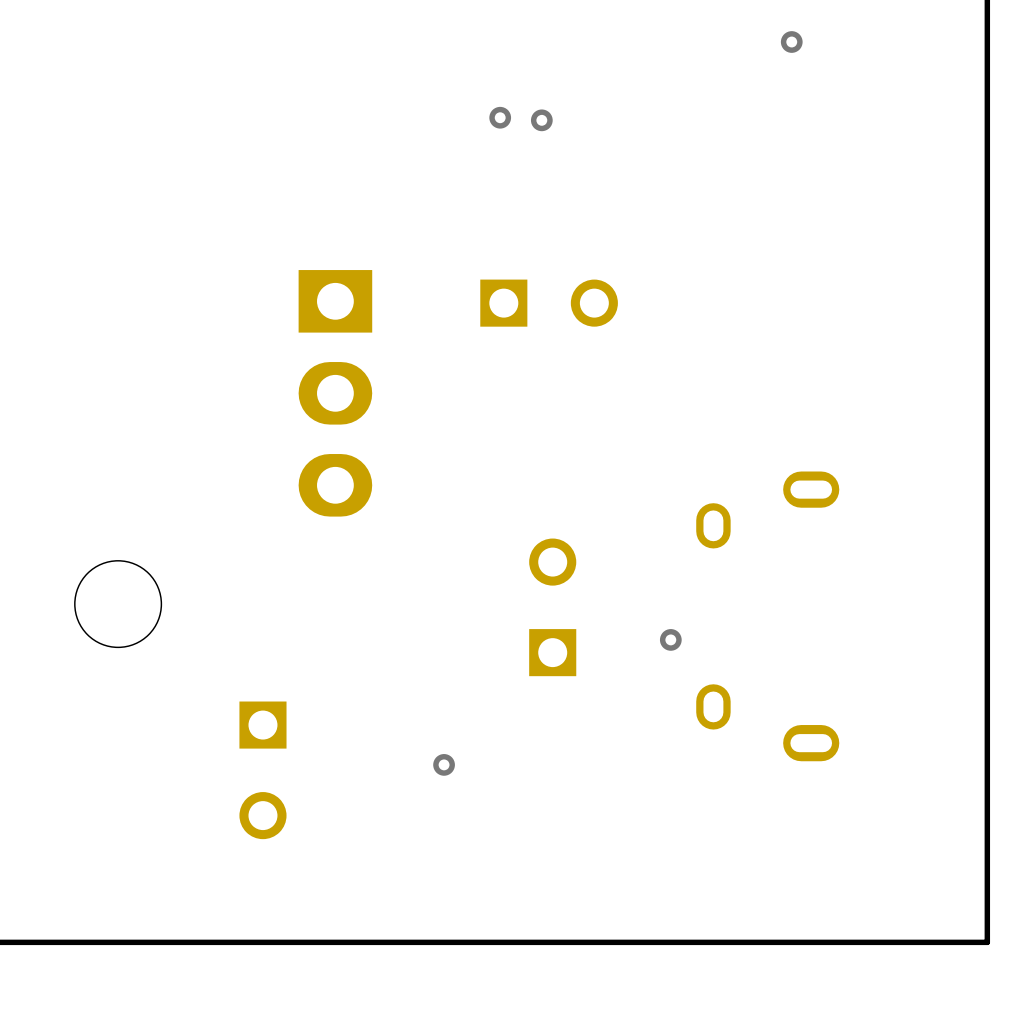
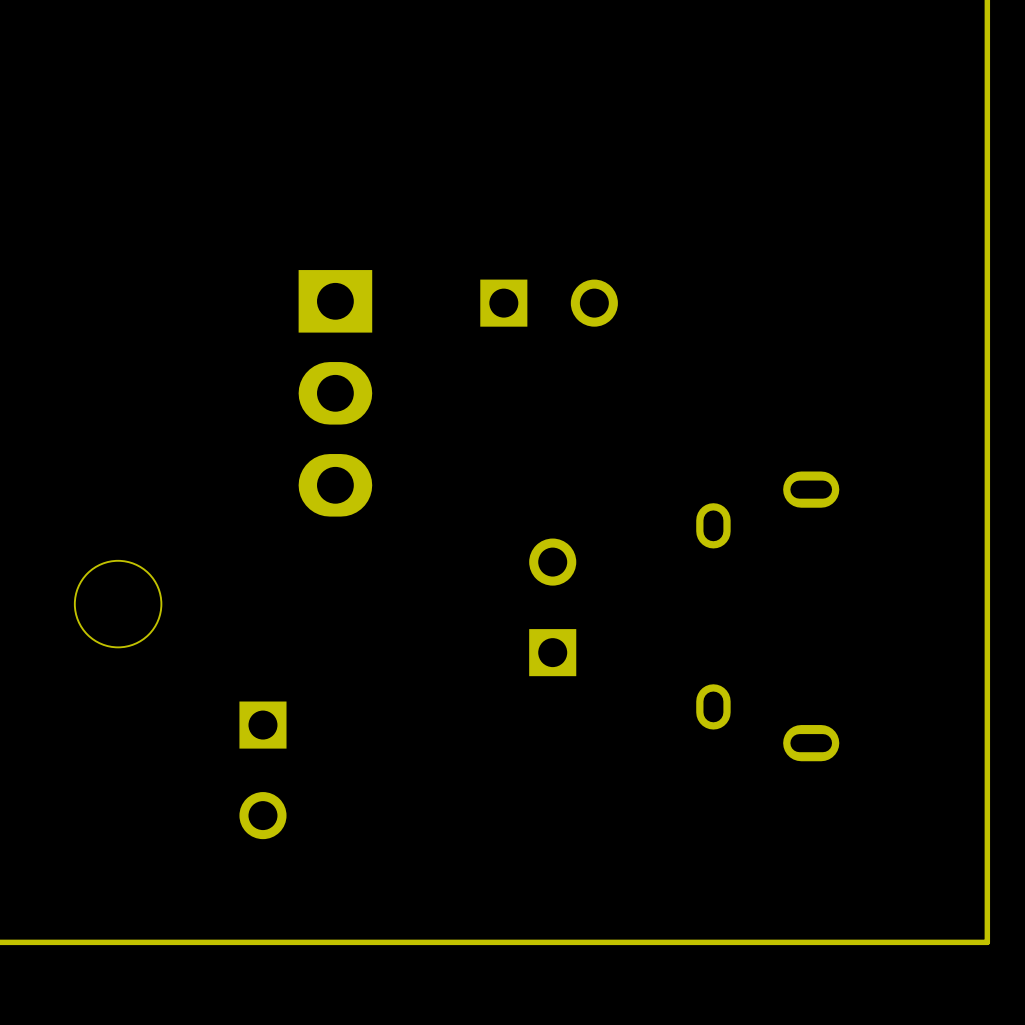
via: (791, 42) -> none
via: (500, 117) -> none
via: (541, 120) -> none
via: (670, 639) -> none
via: (444, 764) -> none

